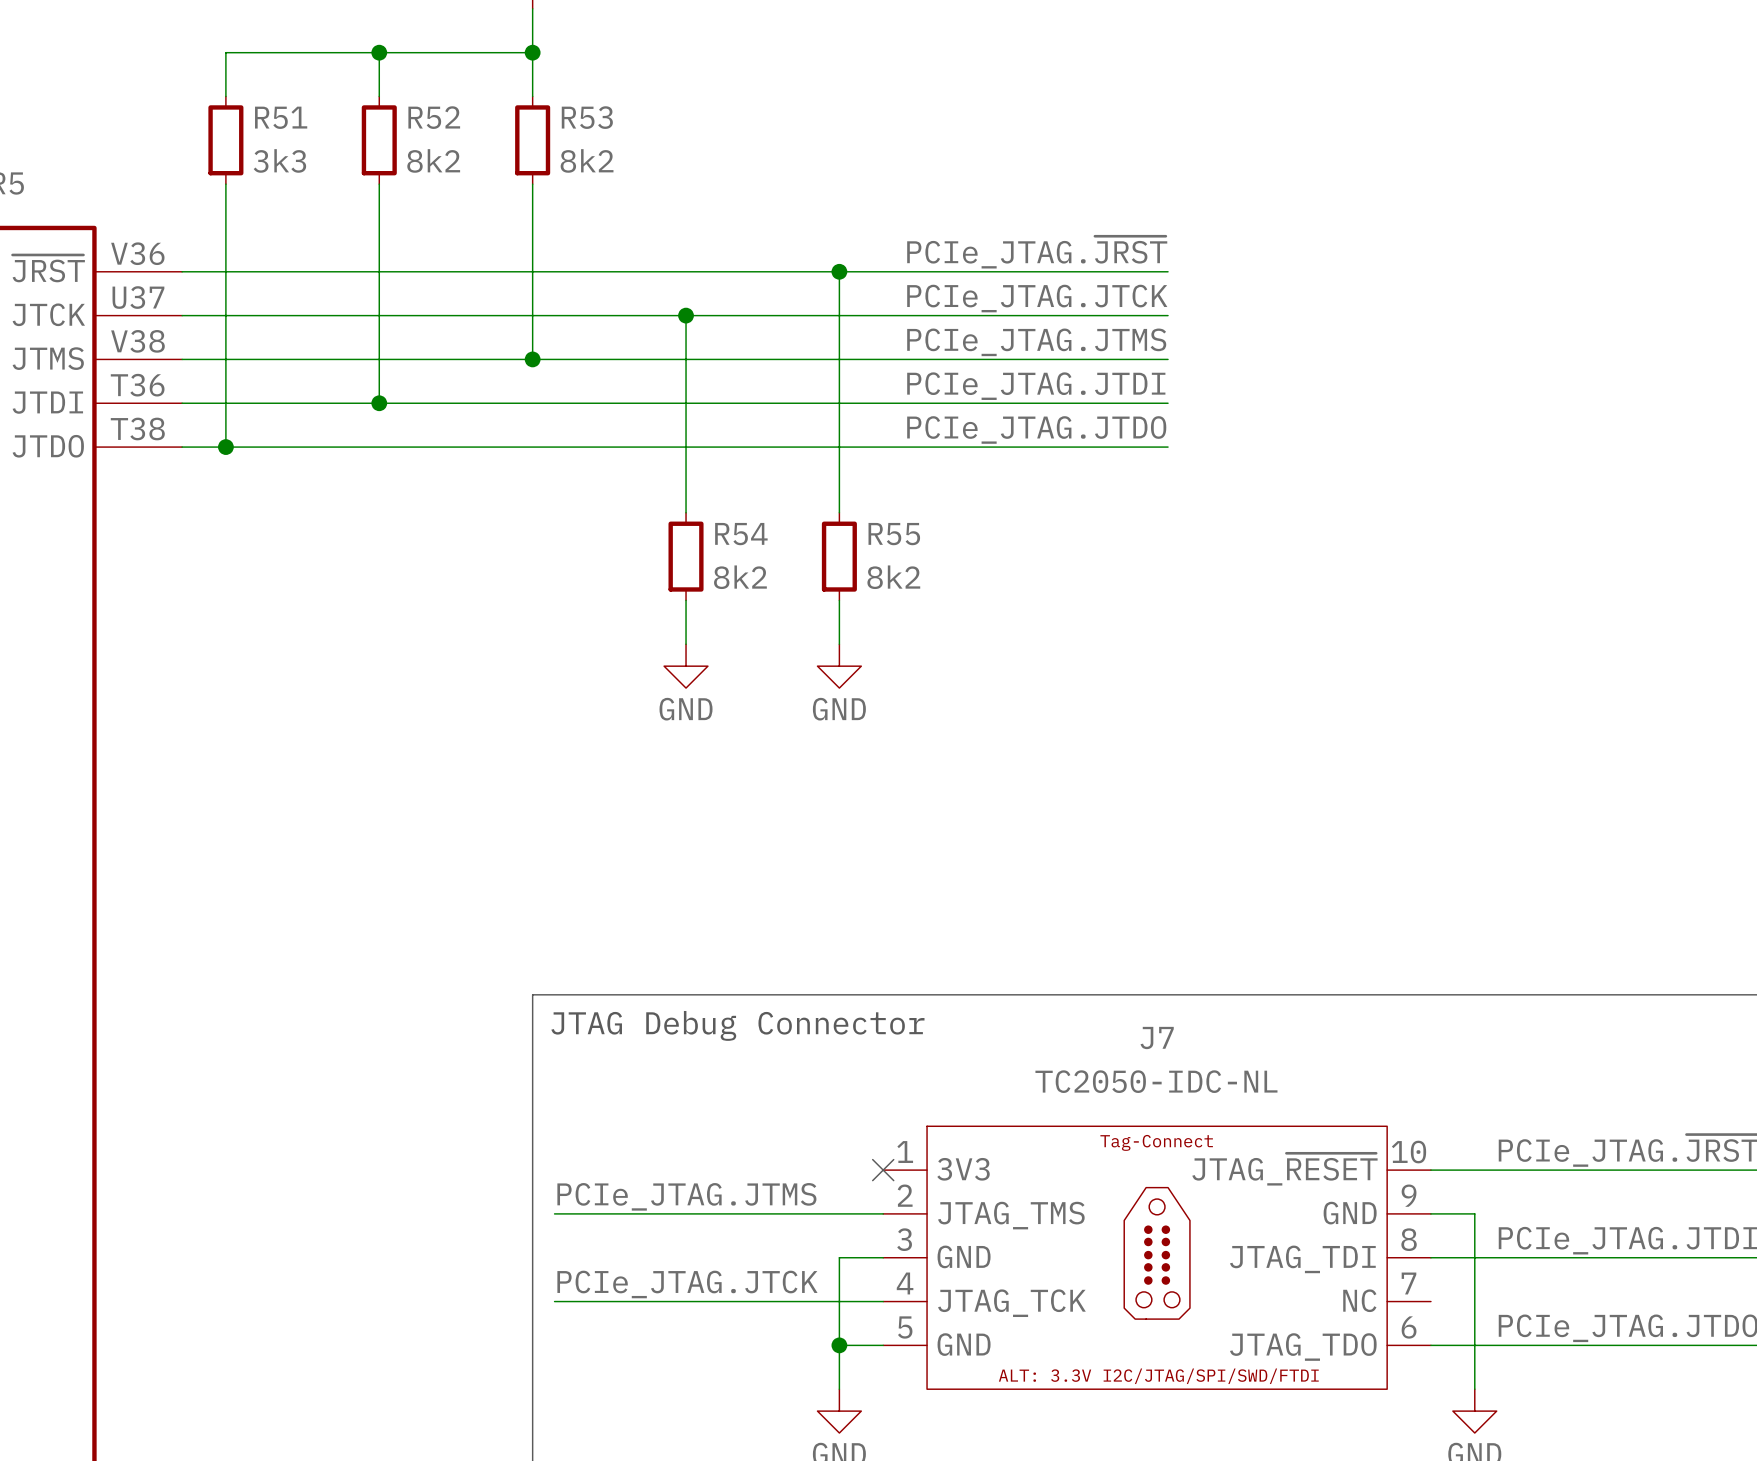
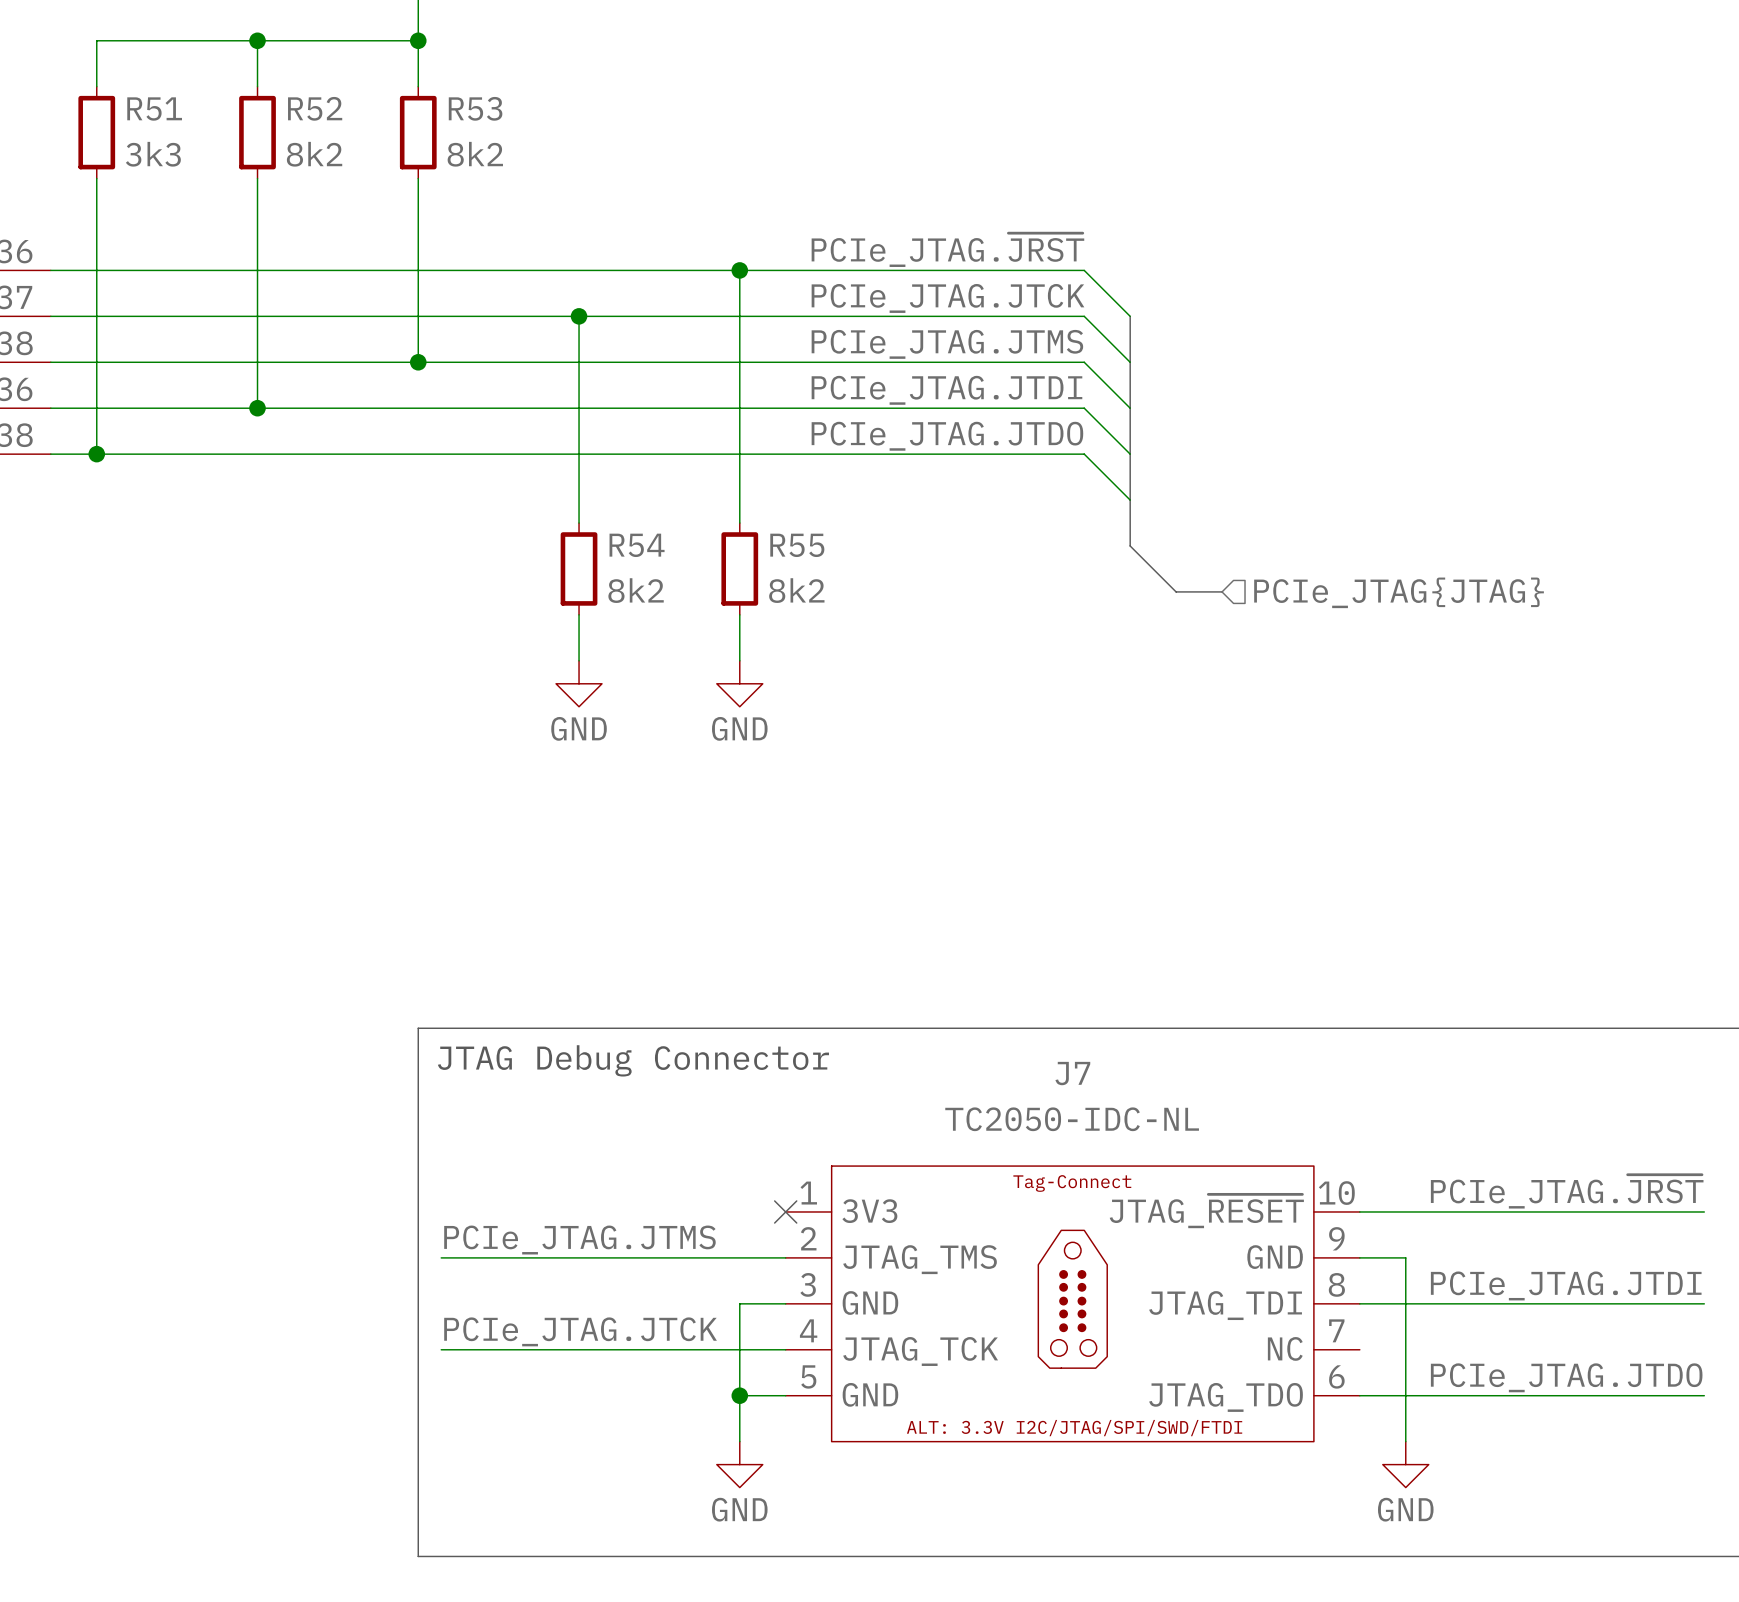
label position: PCIe_JTAG.~{JRST} (1037, 252) -> PCIe_JTAG.~{JRST} (947, 250)
wire: none -> (1084, 270) (1130, 316)
label position: PCIe_JTAG.JTCK (1037, 298) -> PCIe_JTAG.JTCK (947, 298)
wire: none -> (1084, 316) (1130, 362)
bus: none -> (1130, 316) (1130, 546) (1176, 591) (1222, 591)
label position: PCIe_JTAG.JTMS (1036, 342) -> PCIe_JTAG.JTMS (947, 344)
wire: none -> (1084, 362) (1130, 408)
label position: PCIe_JTAG.JTDI (1036, 386) -> PCIe_JTAG.JTDI (946, 390)
wire: none -> (1084, 408) (1130, 454)
label position: PCIe_JTAG.JTDO (1036, 429) -> PCIe_JTAG.JTDO (947, 436)
wire: none -> (1084, 454) (1130, 500)
hierarchical label: none -> PCIe_JTAG{JTAG} (1399, 592)

